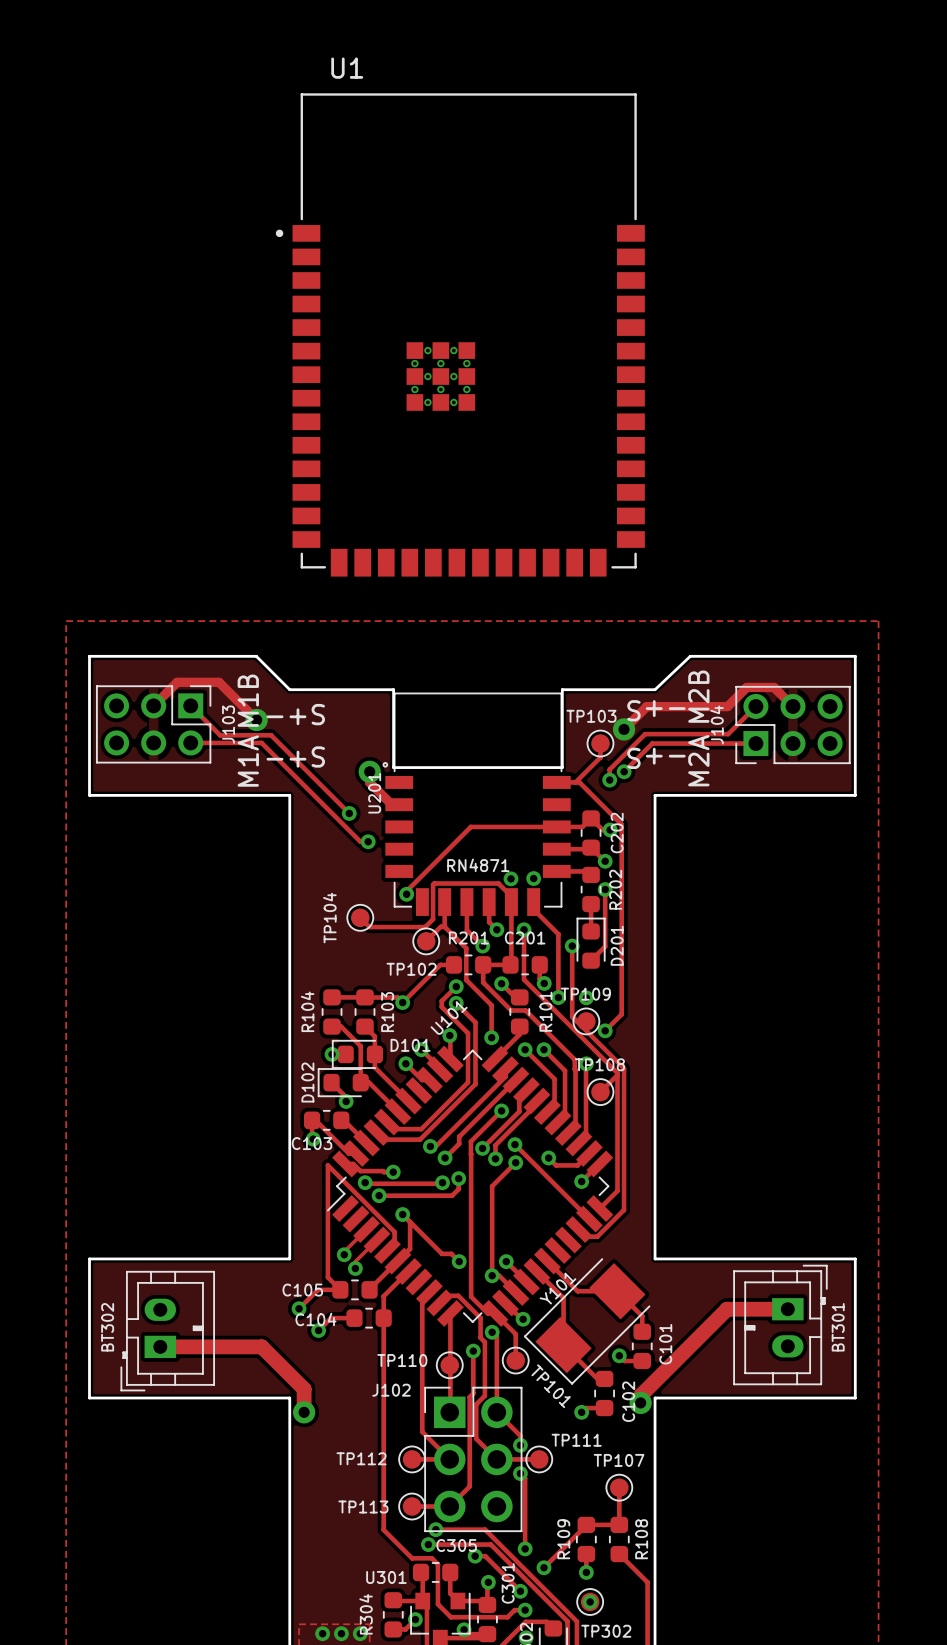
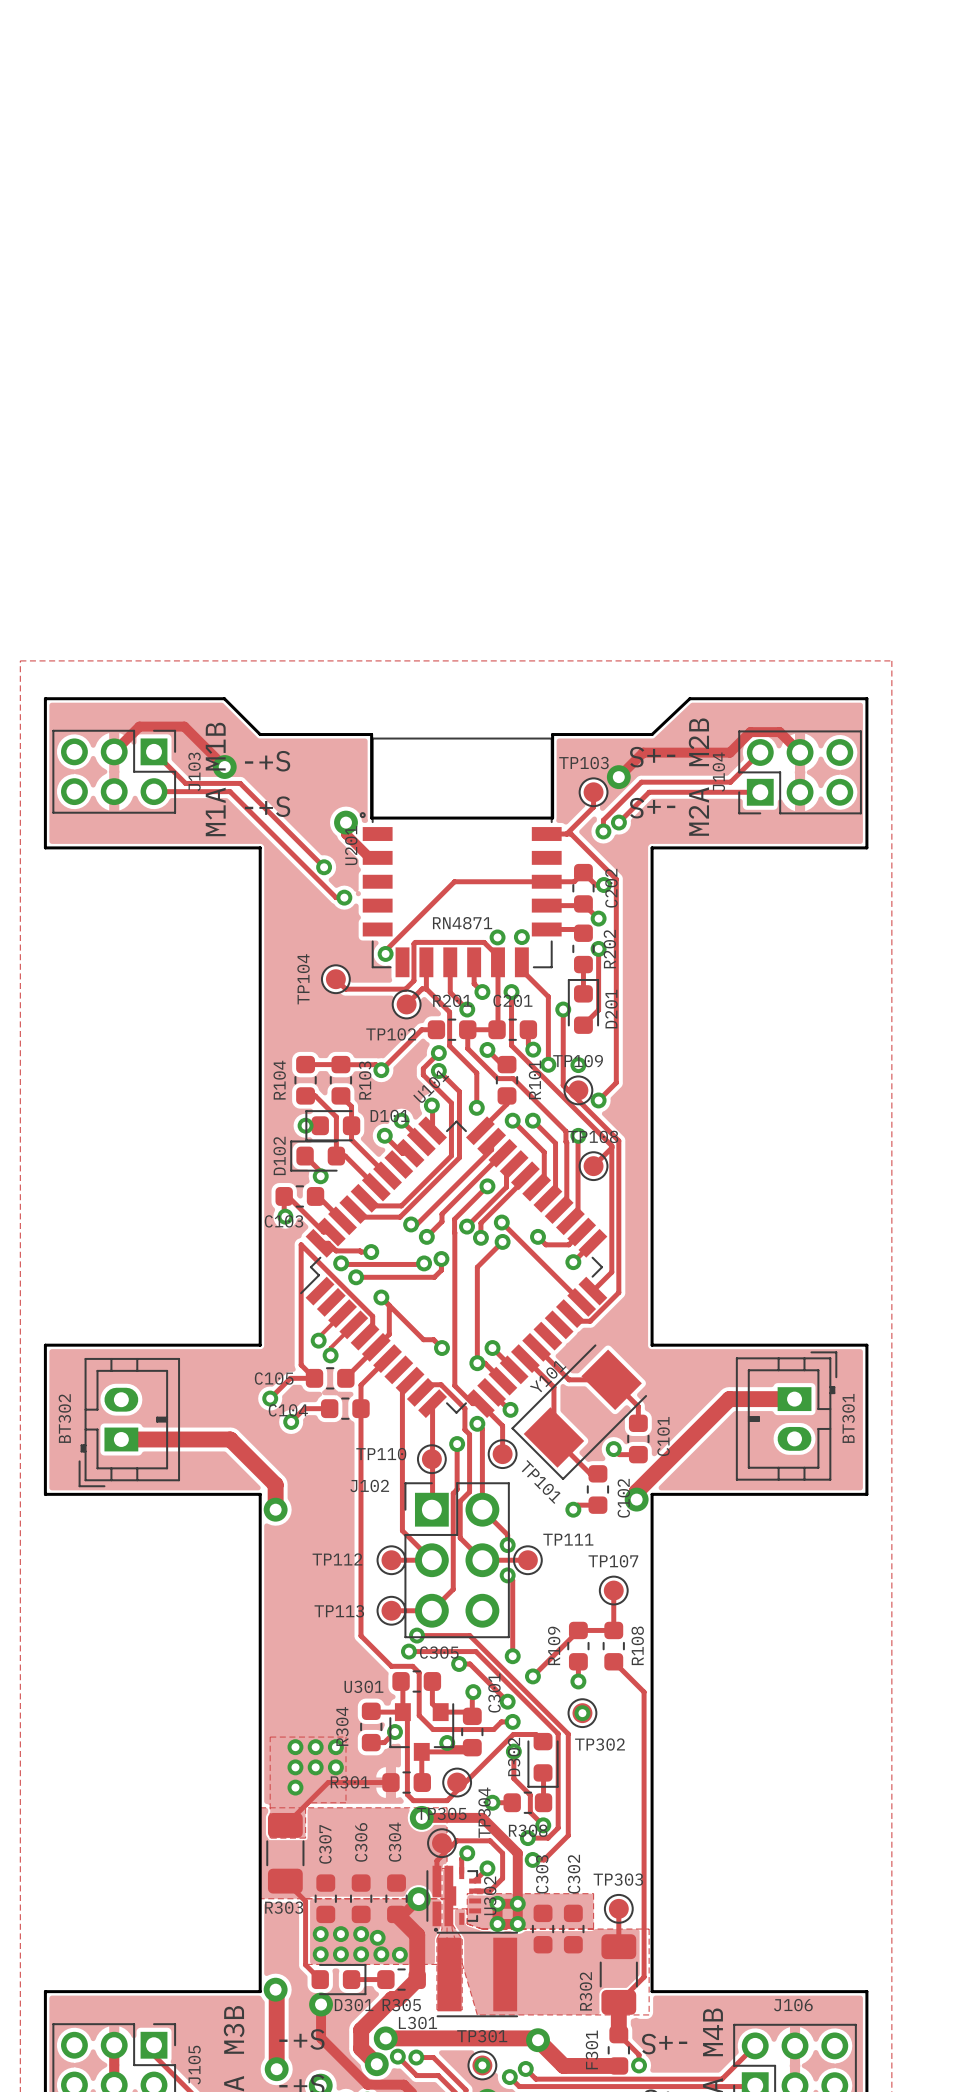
U1: (460, 334) -> none

